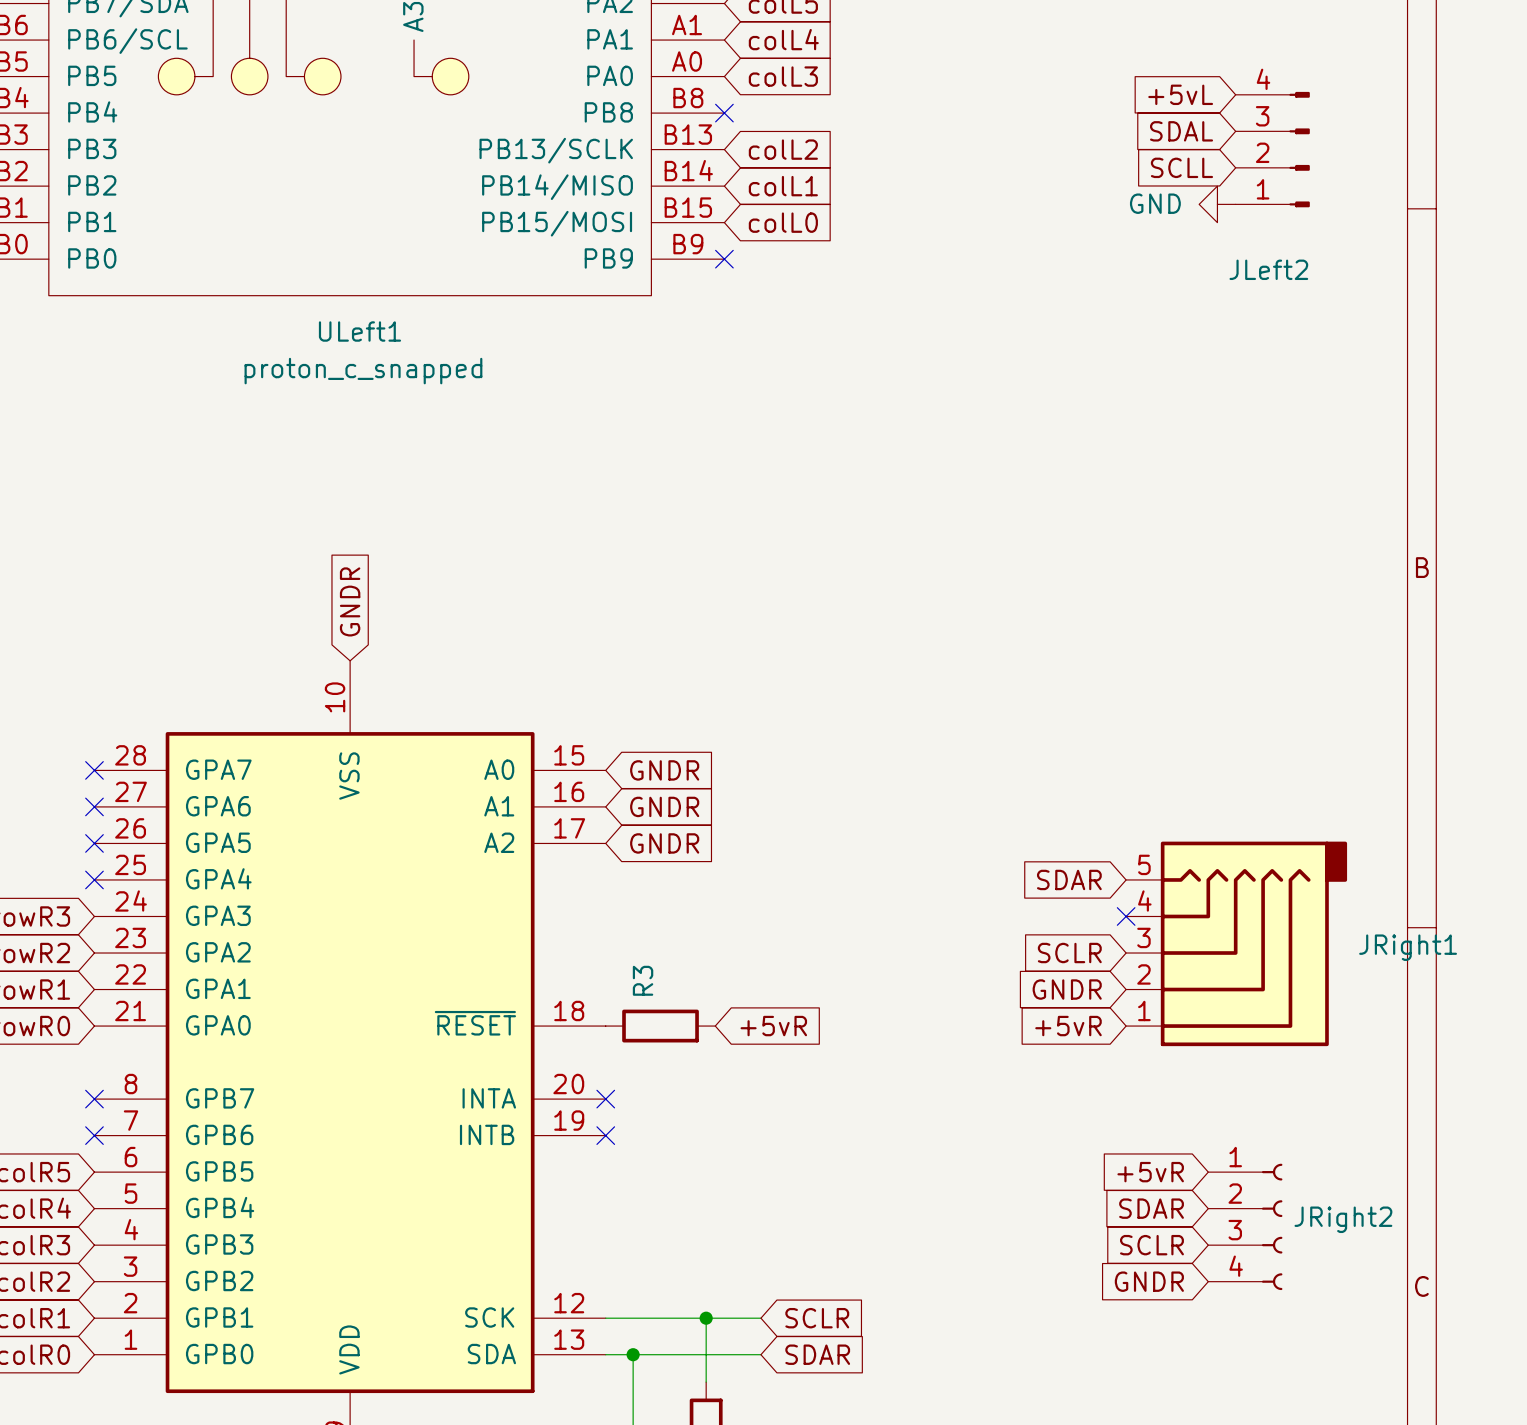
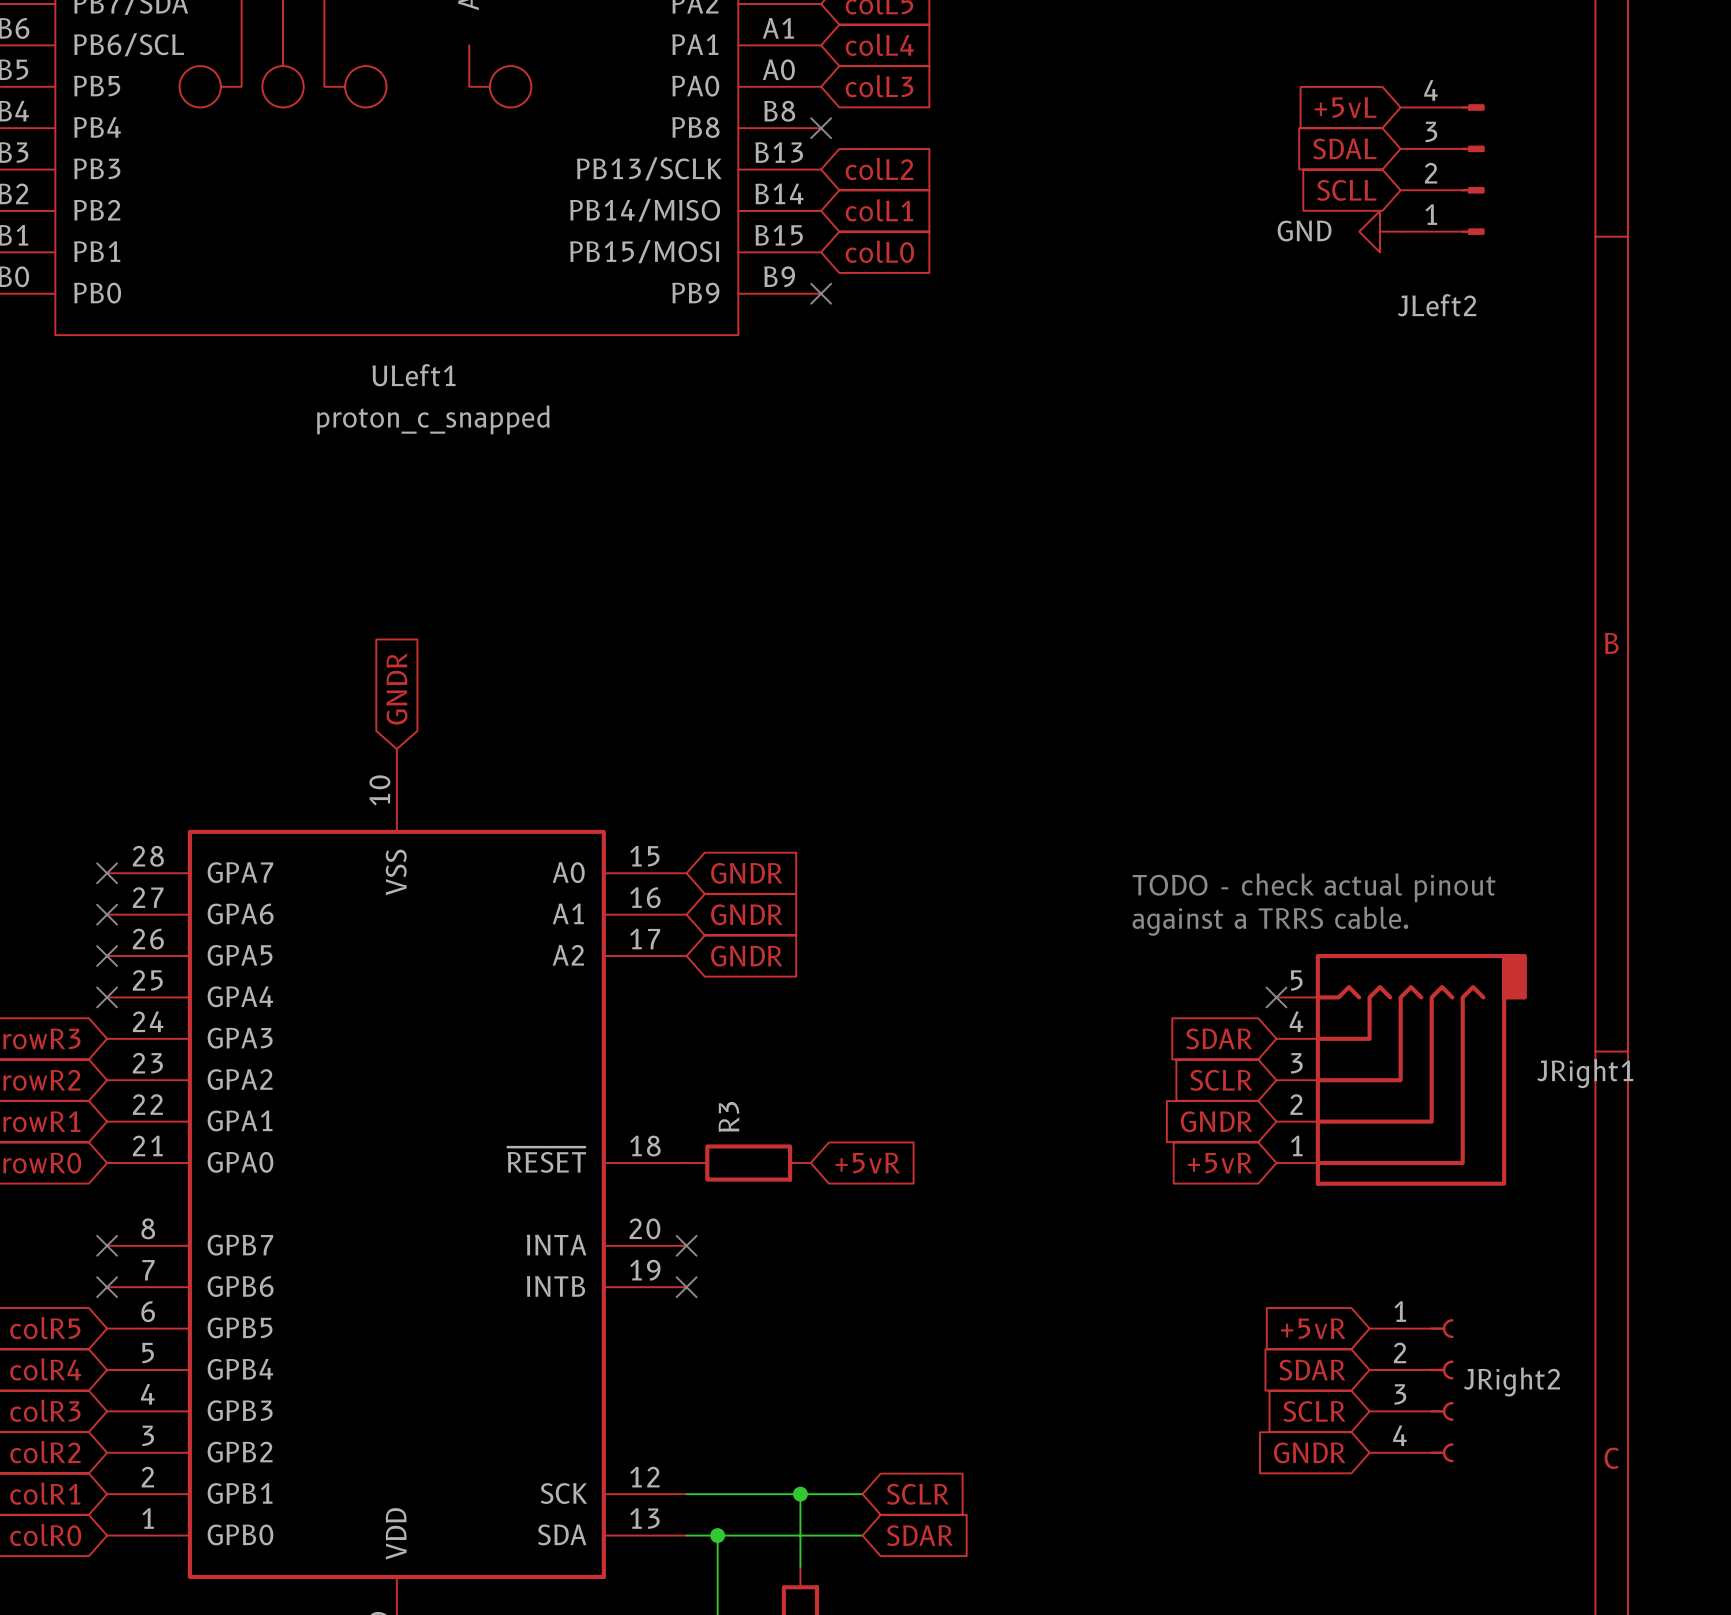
text: none -> TODO - check actual pinout (1314, 887)
text: none -> against a TRRS cable. (1270, 921)
global label position: SDAR (1069, 879) -> SDAR (1219, 1038)
no-connect mark position: (1126, 916) -> (1276, 997)

